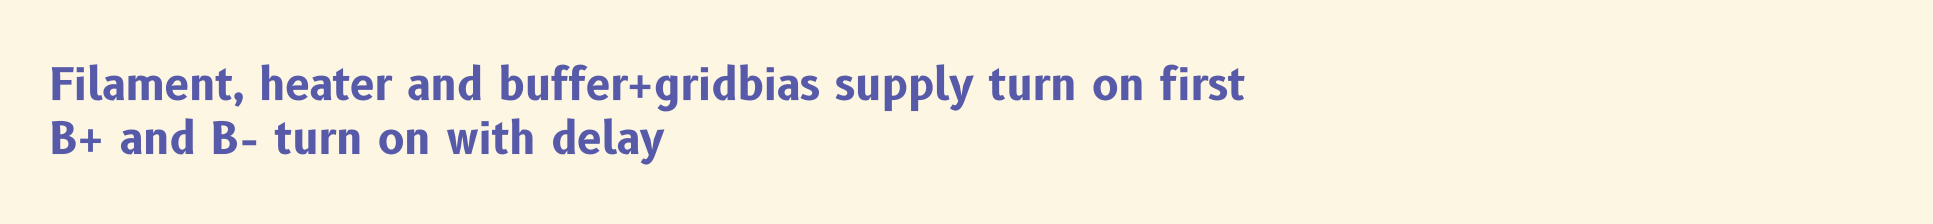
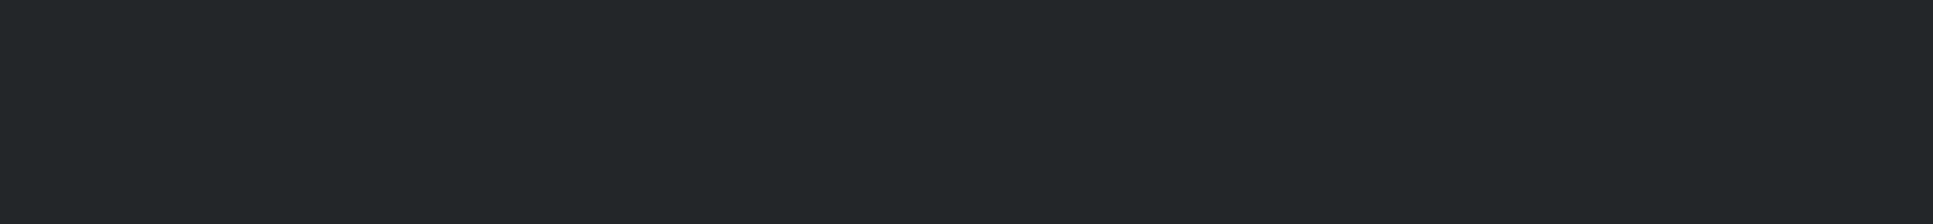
text: Filament, heater and buffer+gridbias supply turn on first (648, 87) -> none
text: B+ and B- turn on with delay (358, 141) -> none

